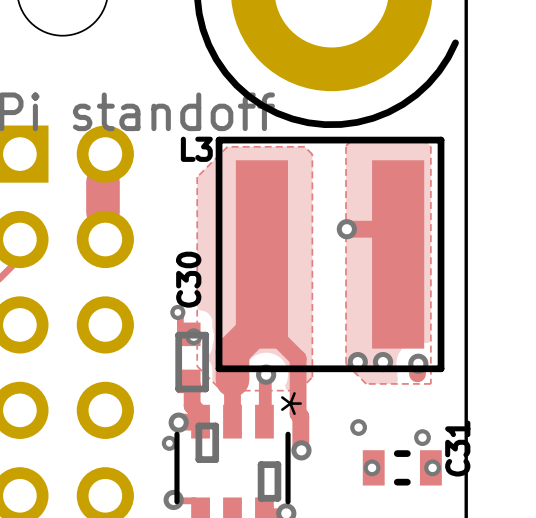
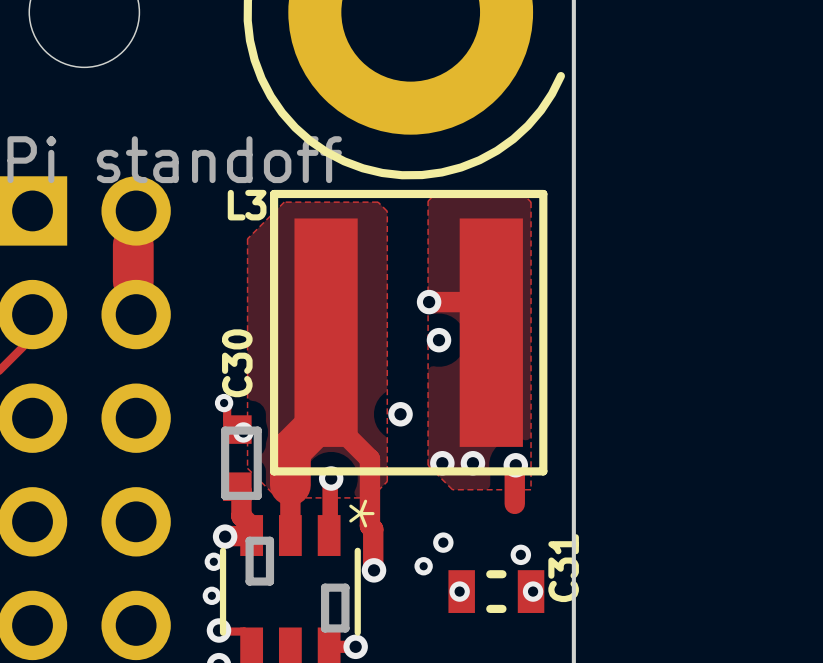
via: none -> (439, 340)
via: none -> (400, 414)
track: none -> (514, 477) (514, 503)
via: none -> (423, 566)
via: none -> (211, 595)

